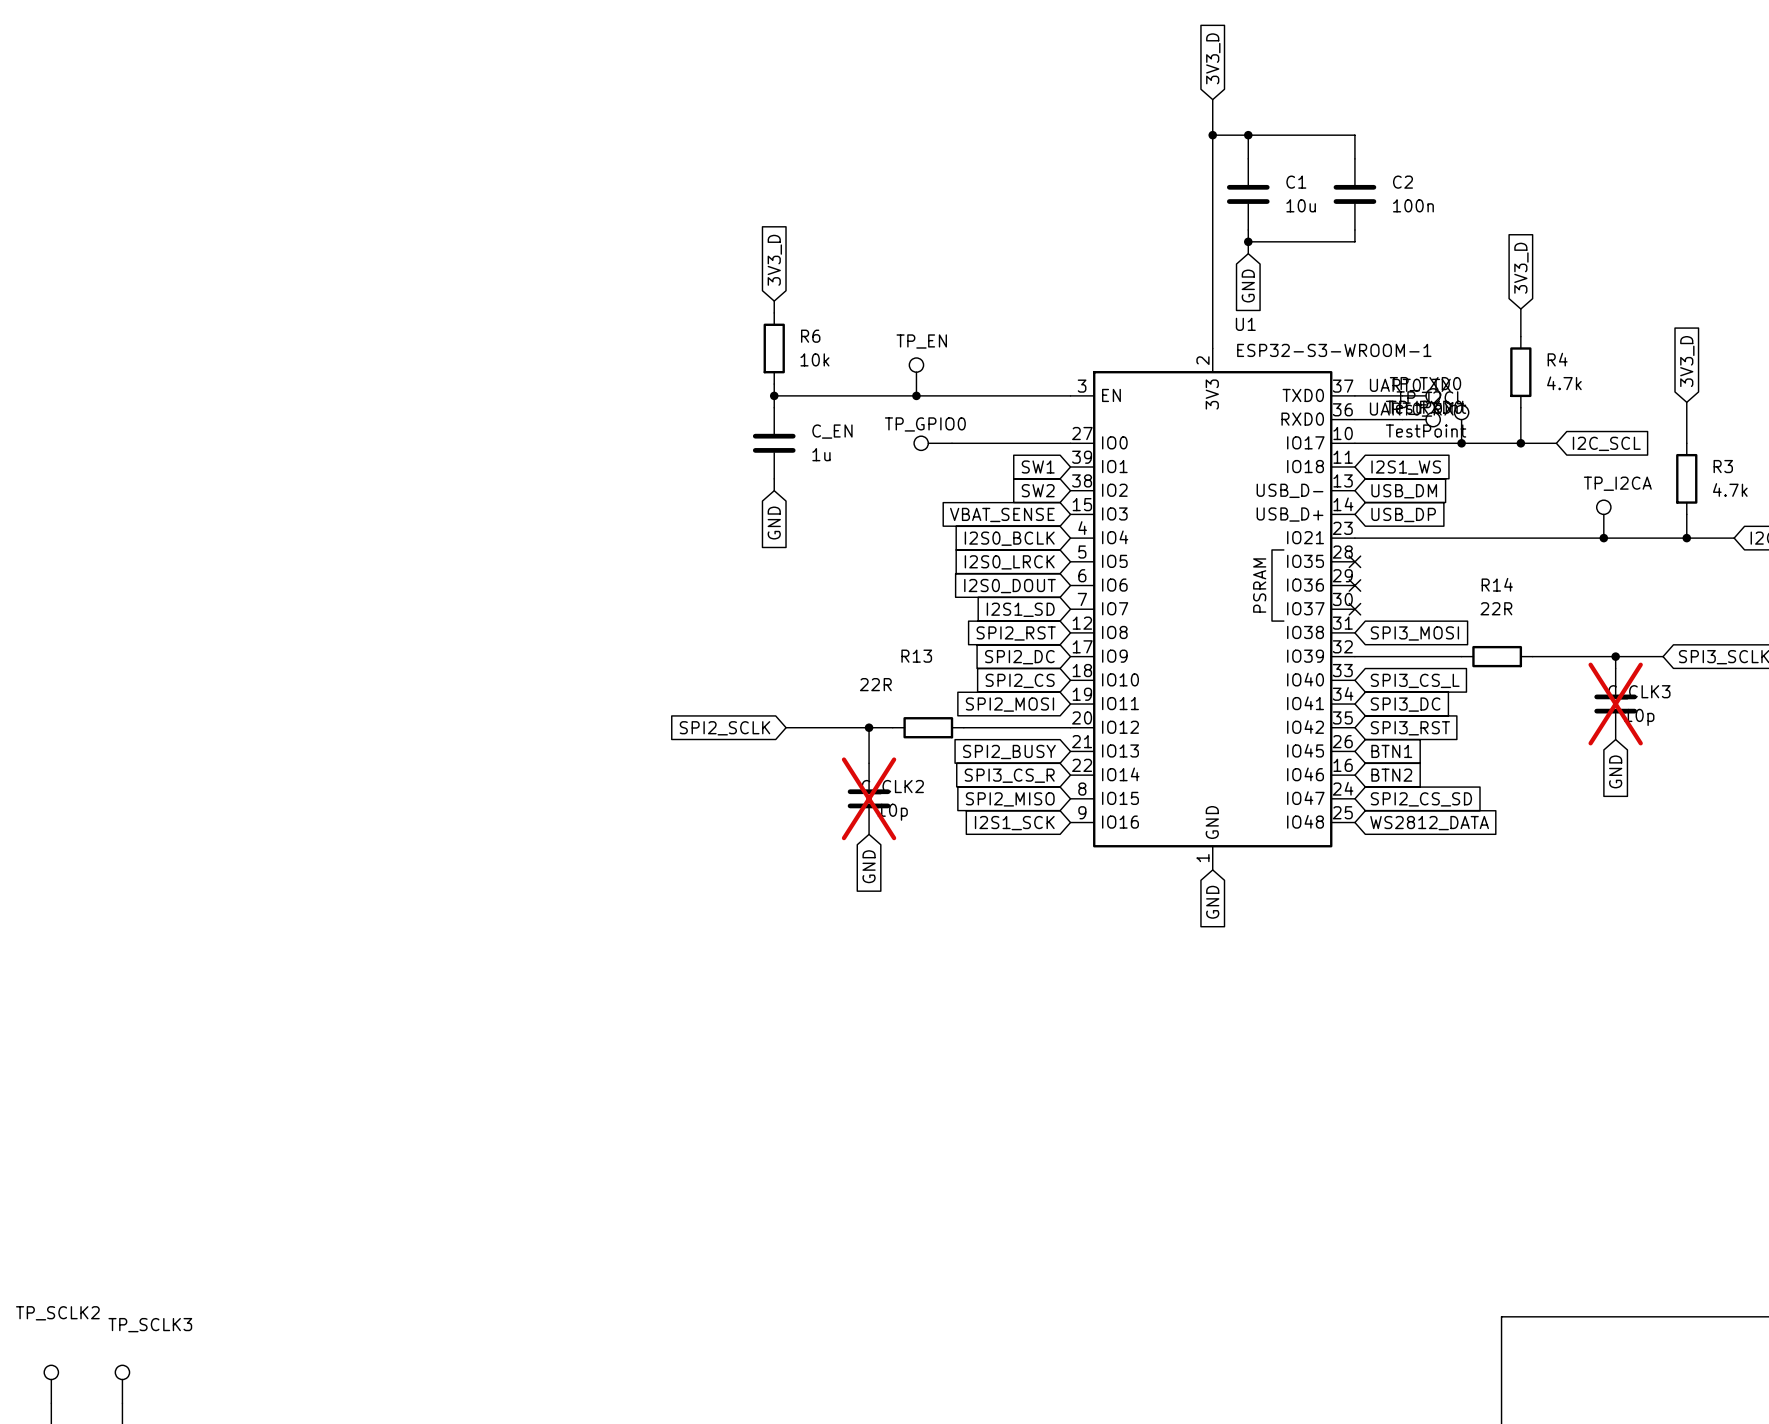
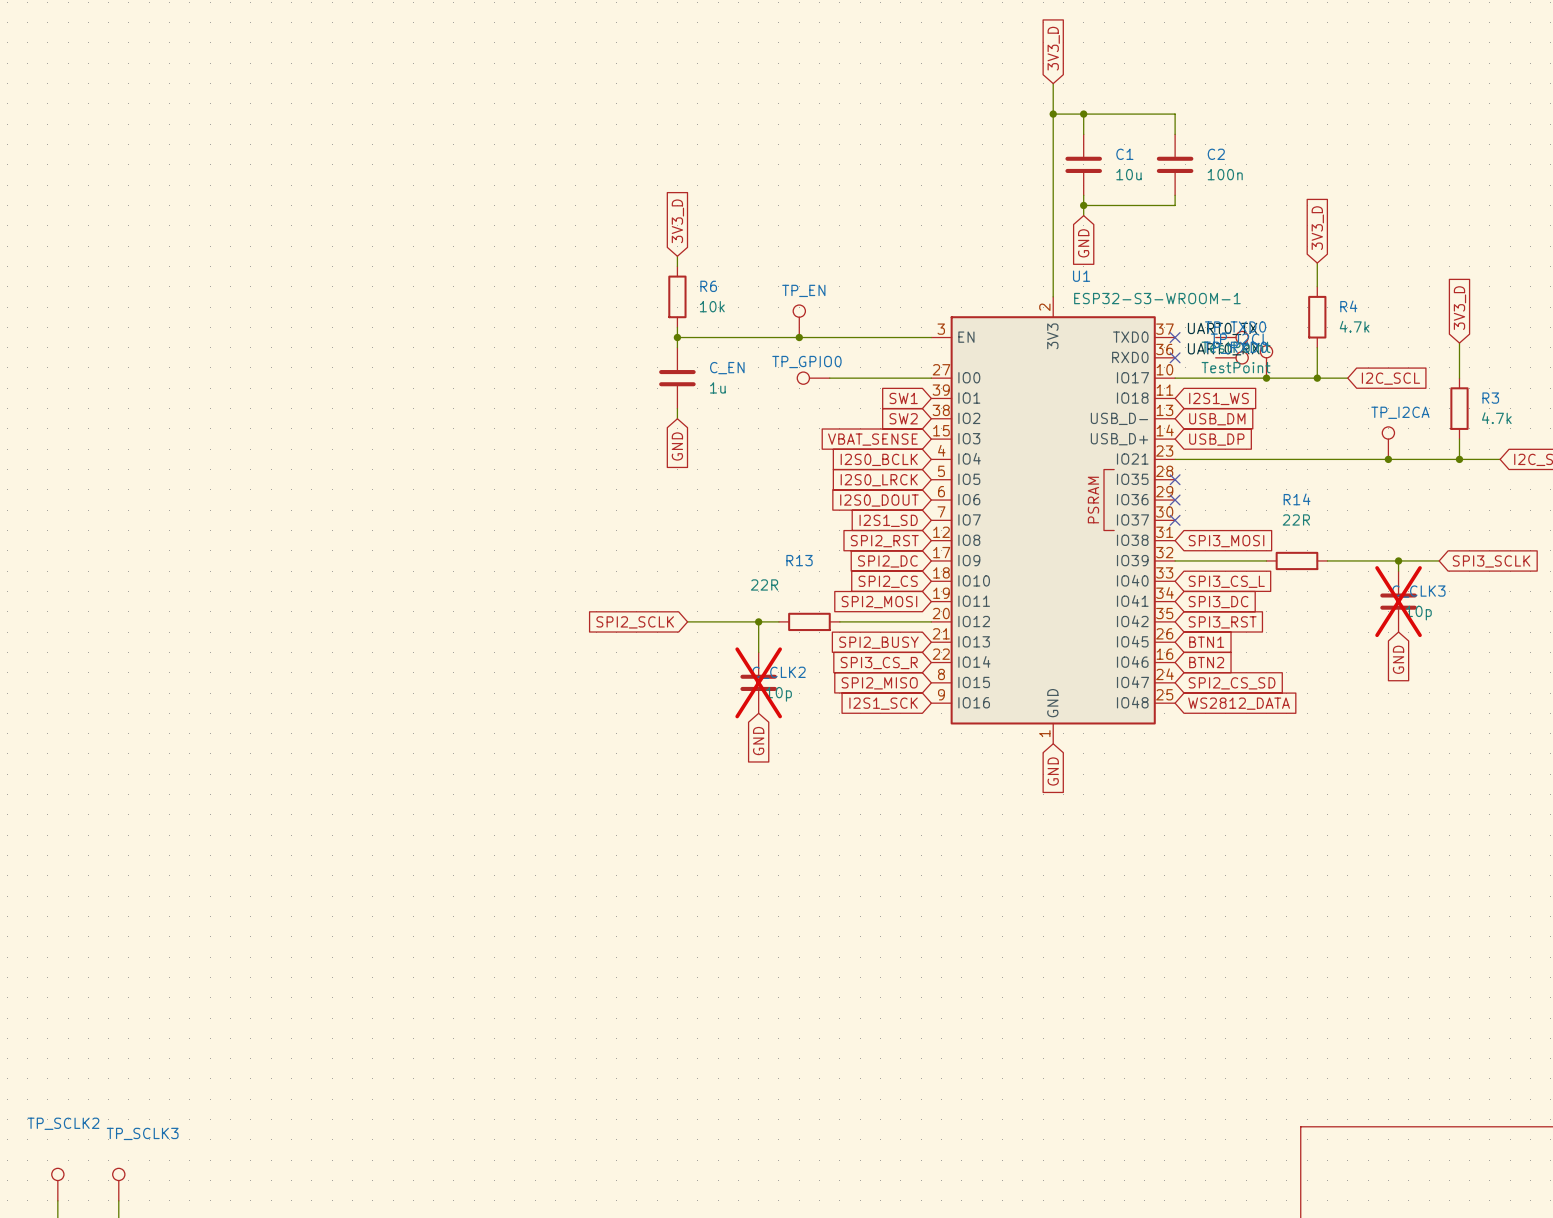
wire: (1354, 395) (1402, 395) -> none
no-connect mark: none -> (1175, 337)
wire: (1354, 419) (1402, 419) -> none
no-connect mark: none -> (1175, 357)

